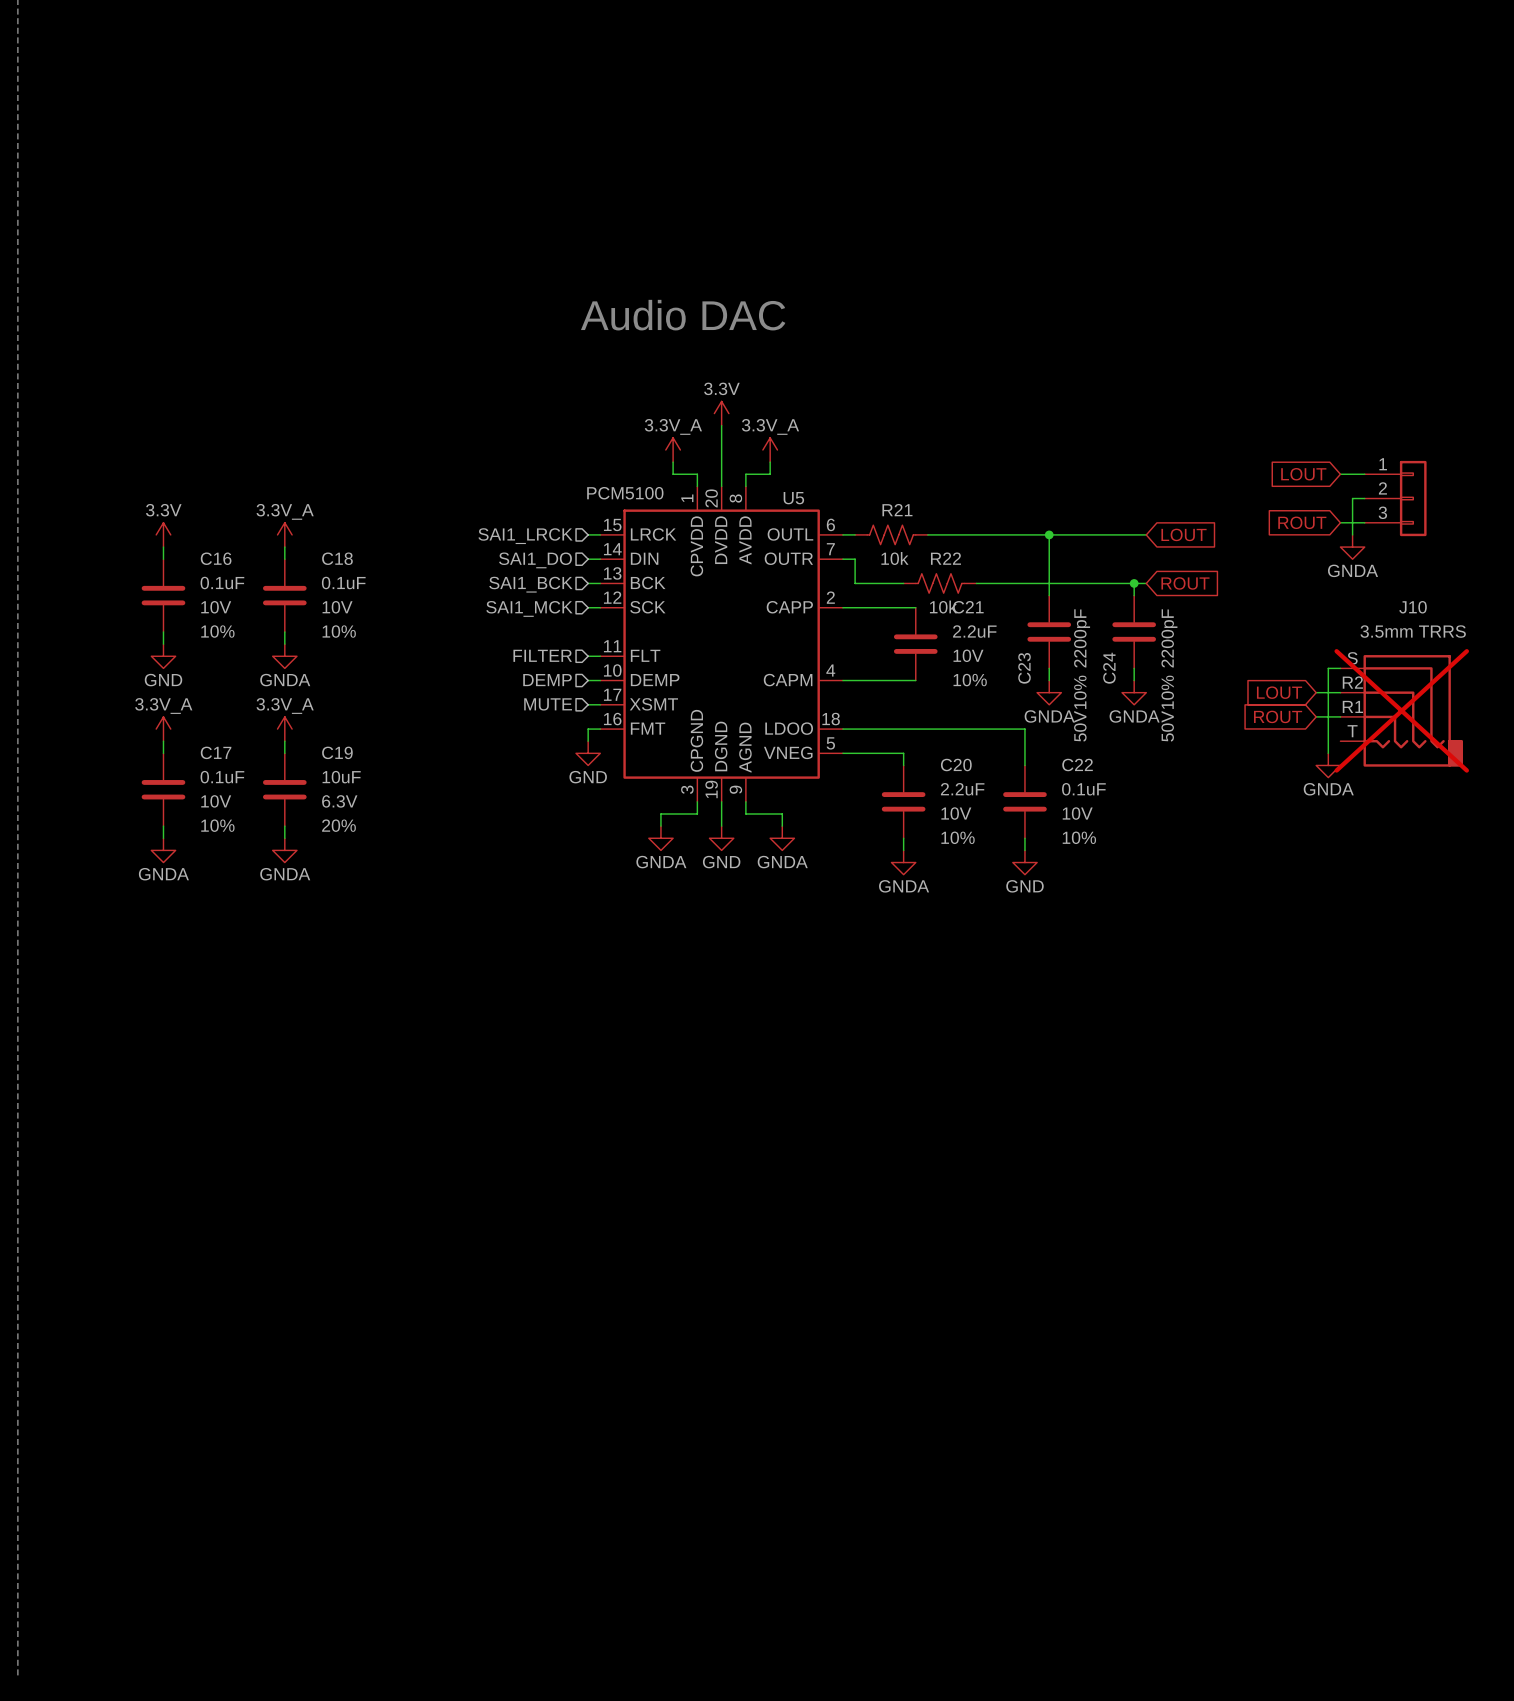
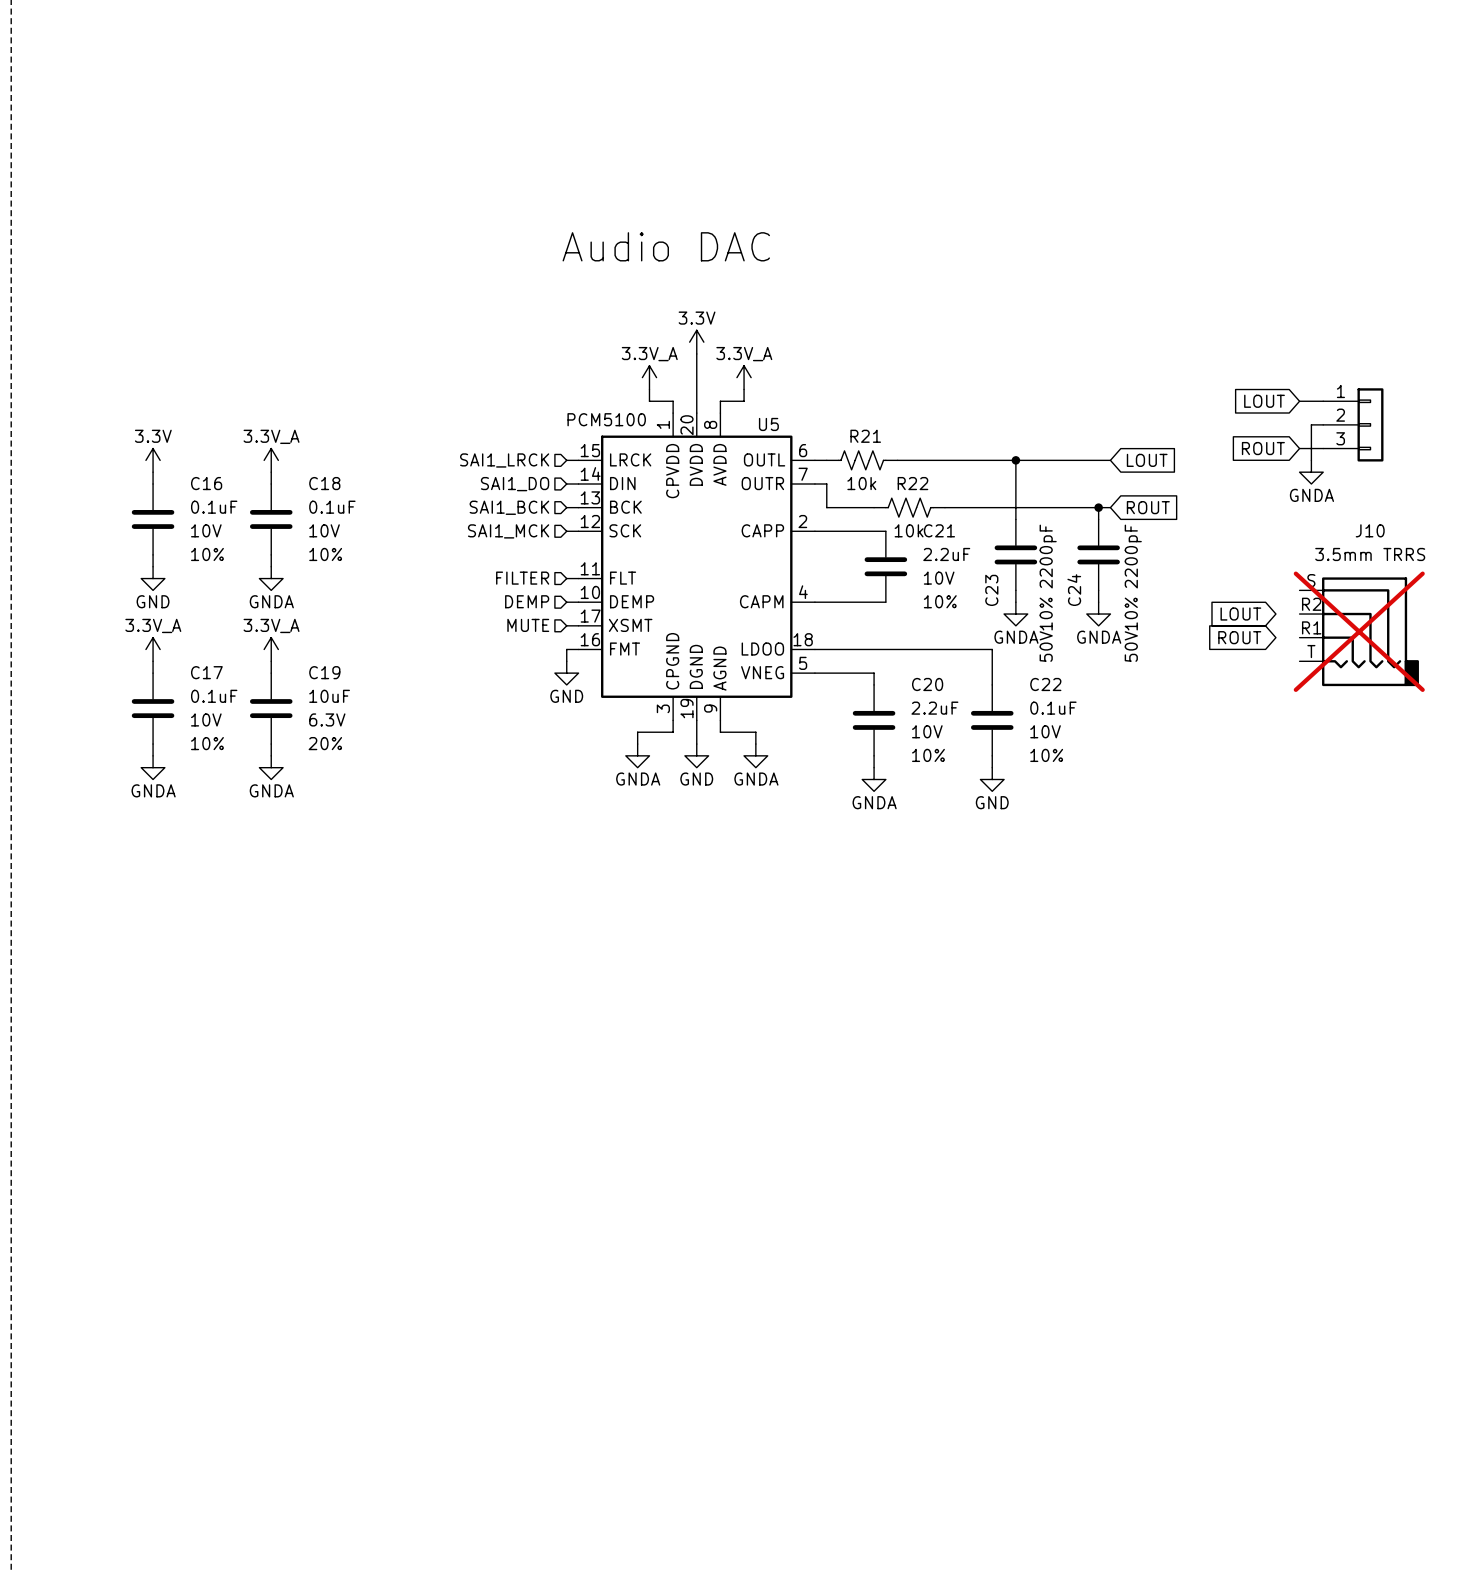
wire: (1340, 668) (1328, 668) (1328, 753) -> none
wire: (1316, 692) (1340, 692) -> none
wire: (1316, 716) (1340, 716) -> none
power symbol: GNDA (1328, 765) -> none

